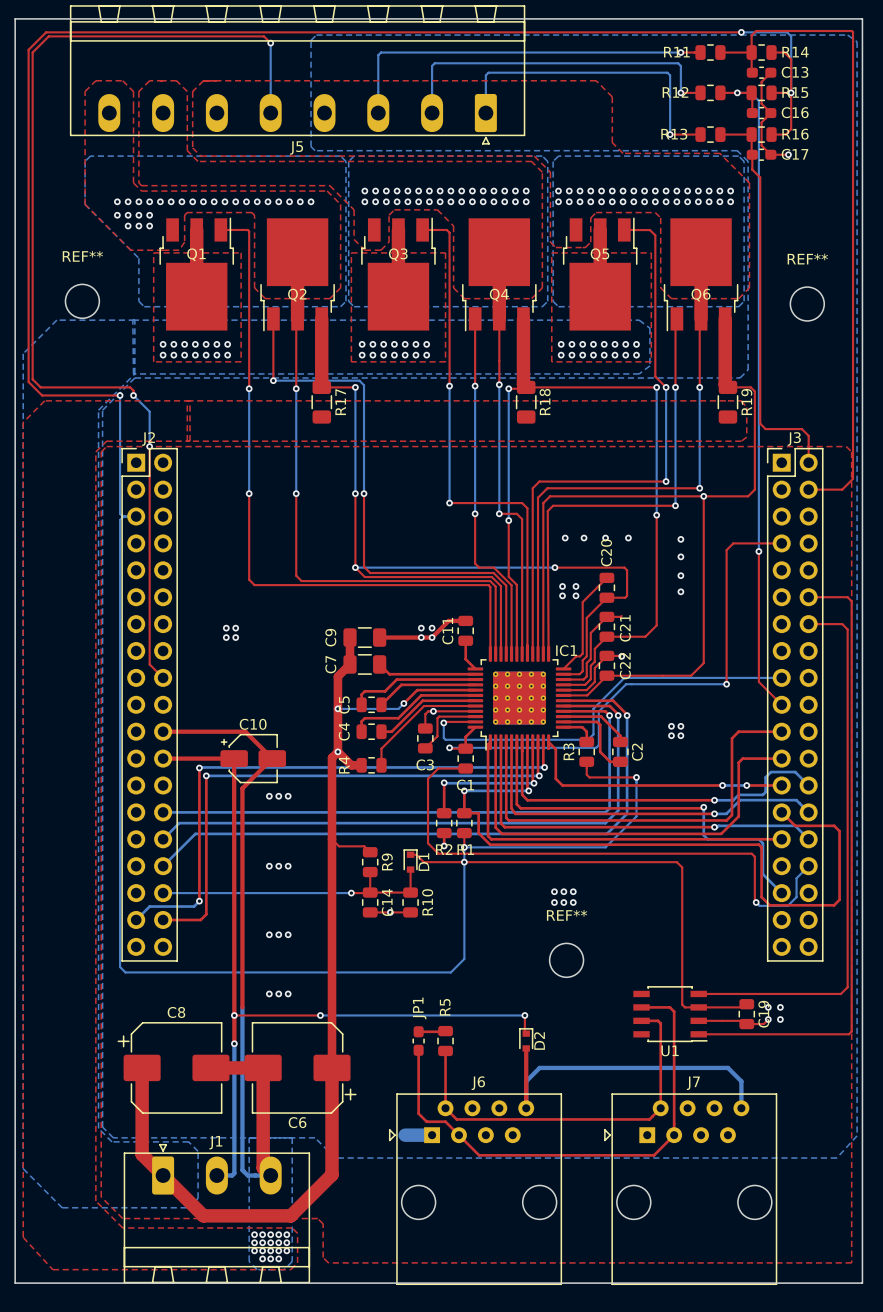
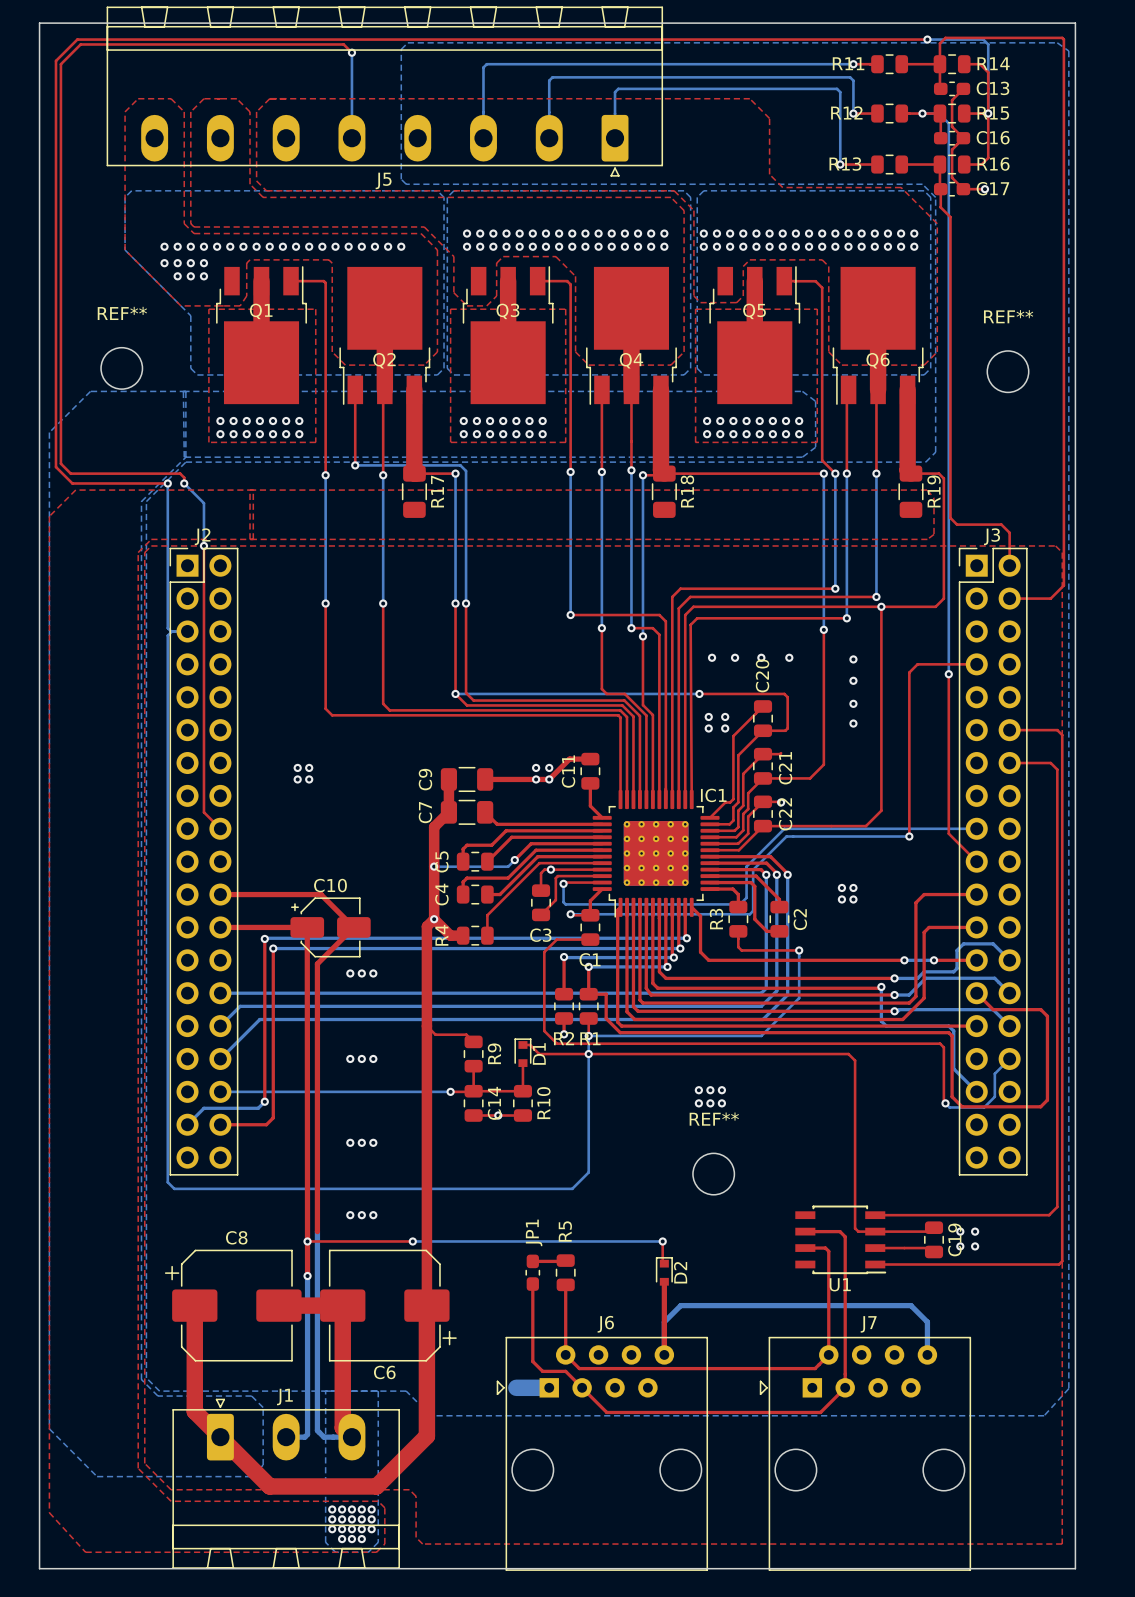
top track: (768, 1019) (763, 1024) (746, 1024) -> none

